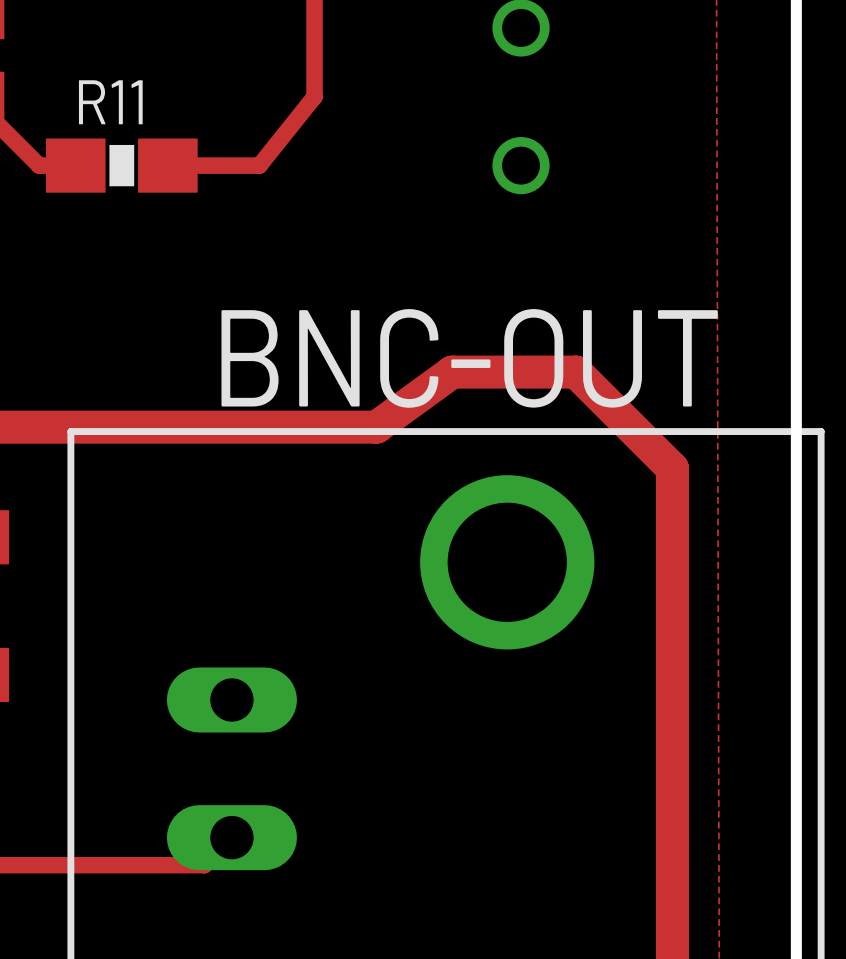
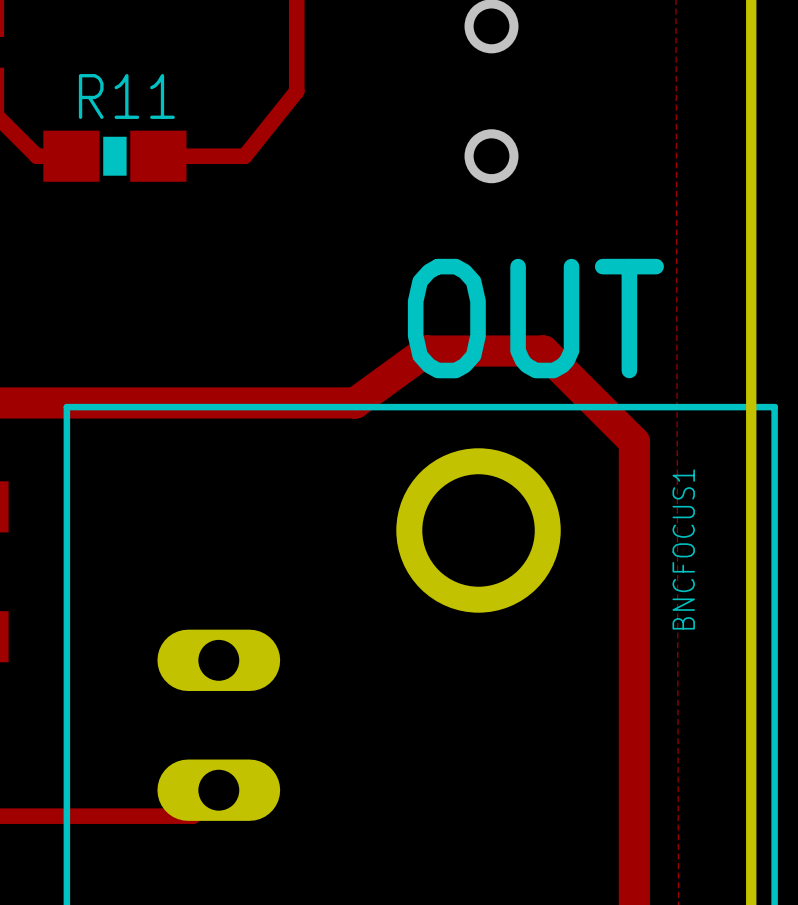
text: none -> OUT (535, 318)
BNC-OUT name: BNC-OUT (469, 358) -> BNCFOCUS1 (683, 549)

